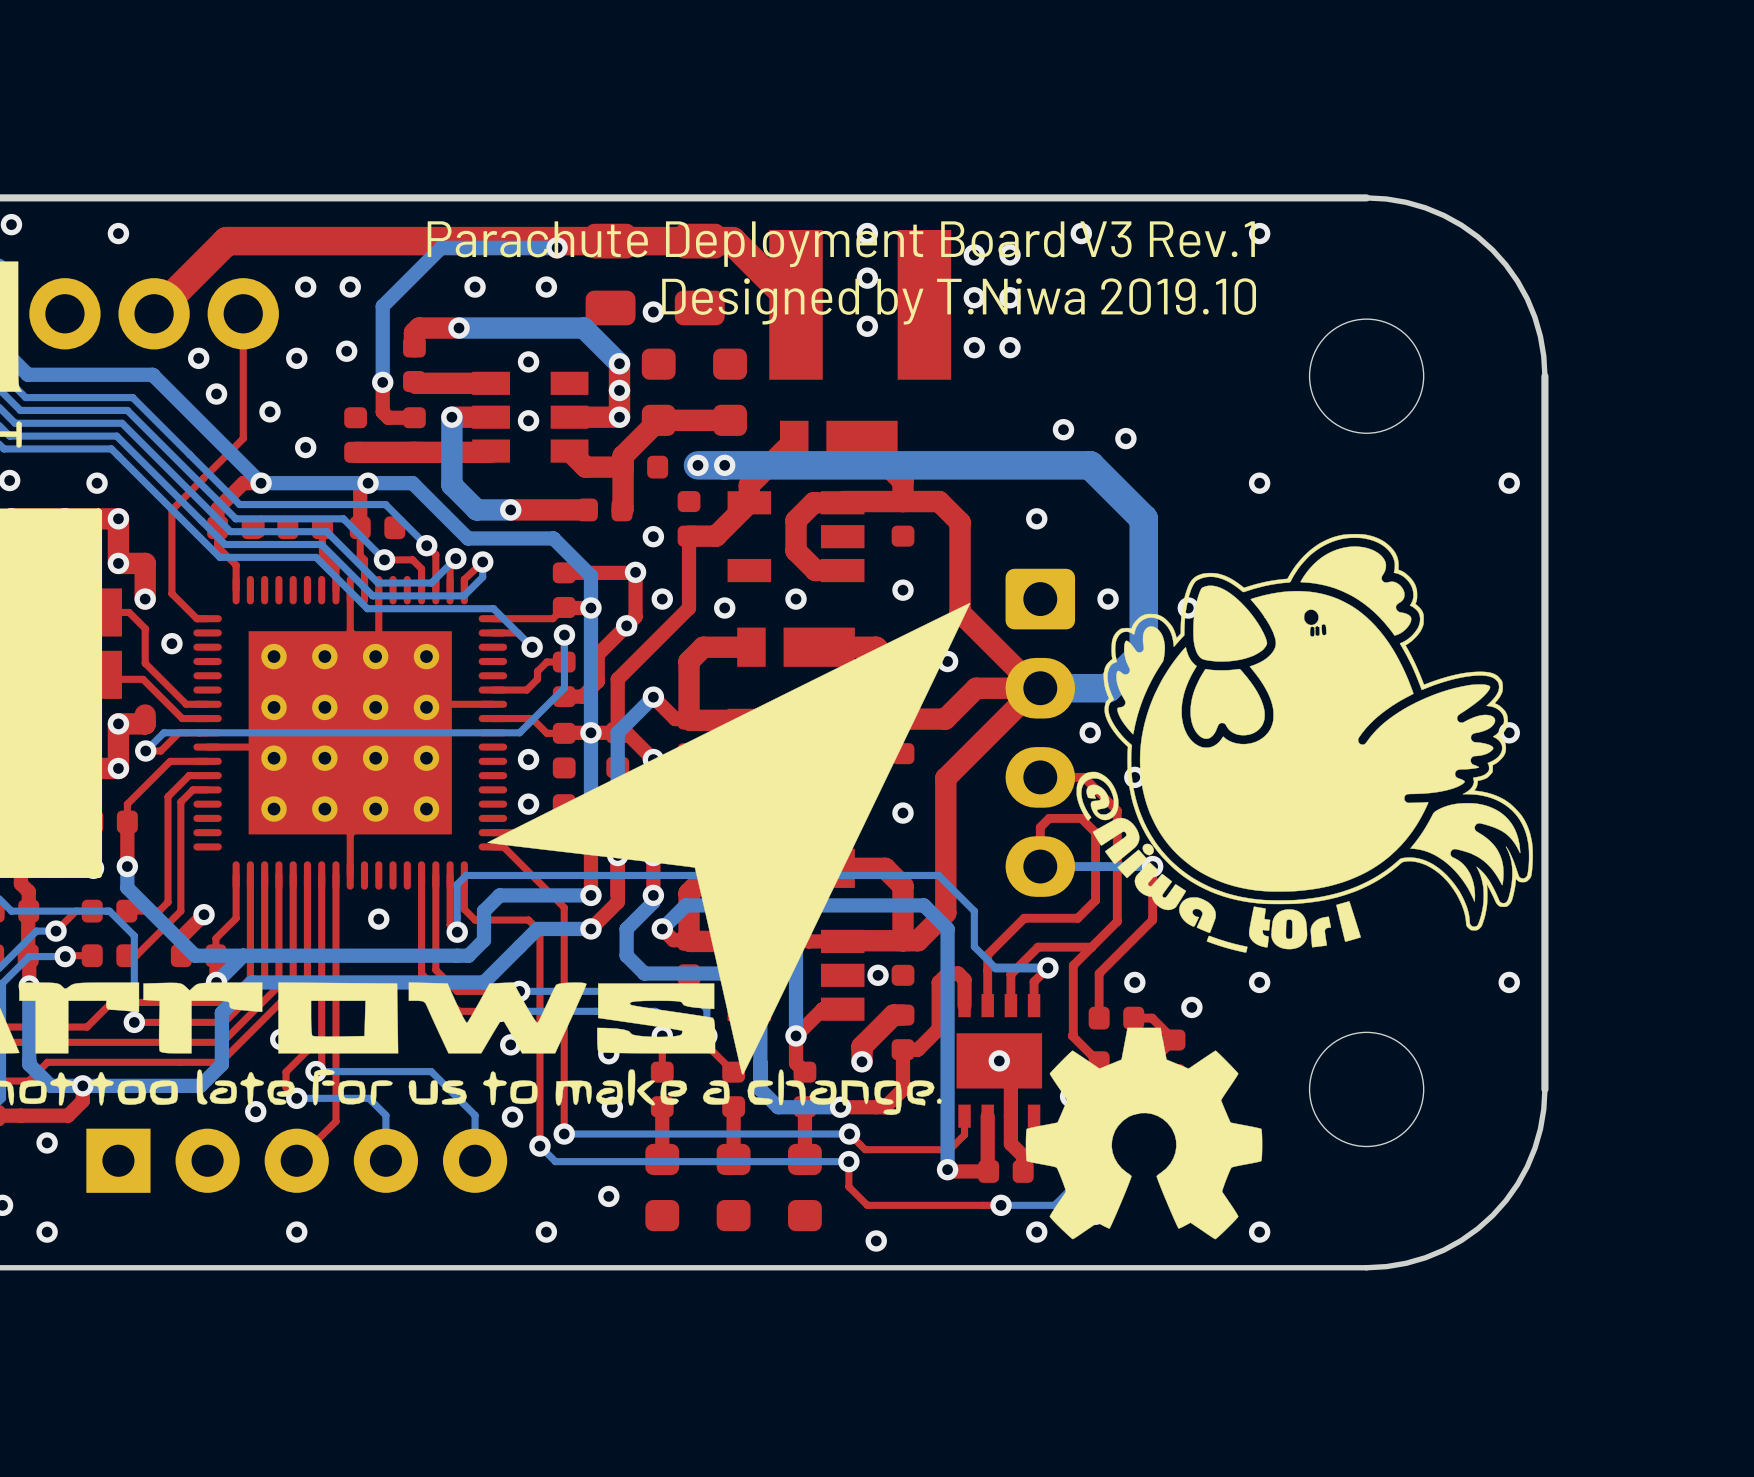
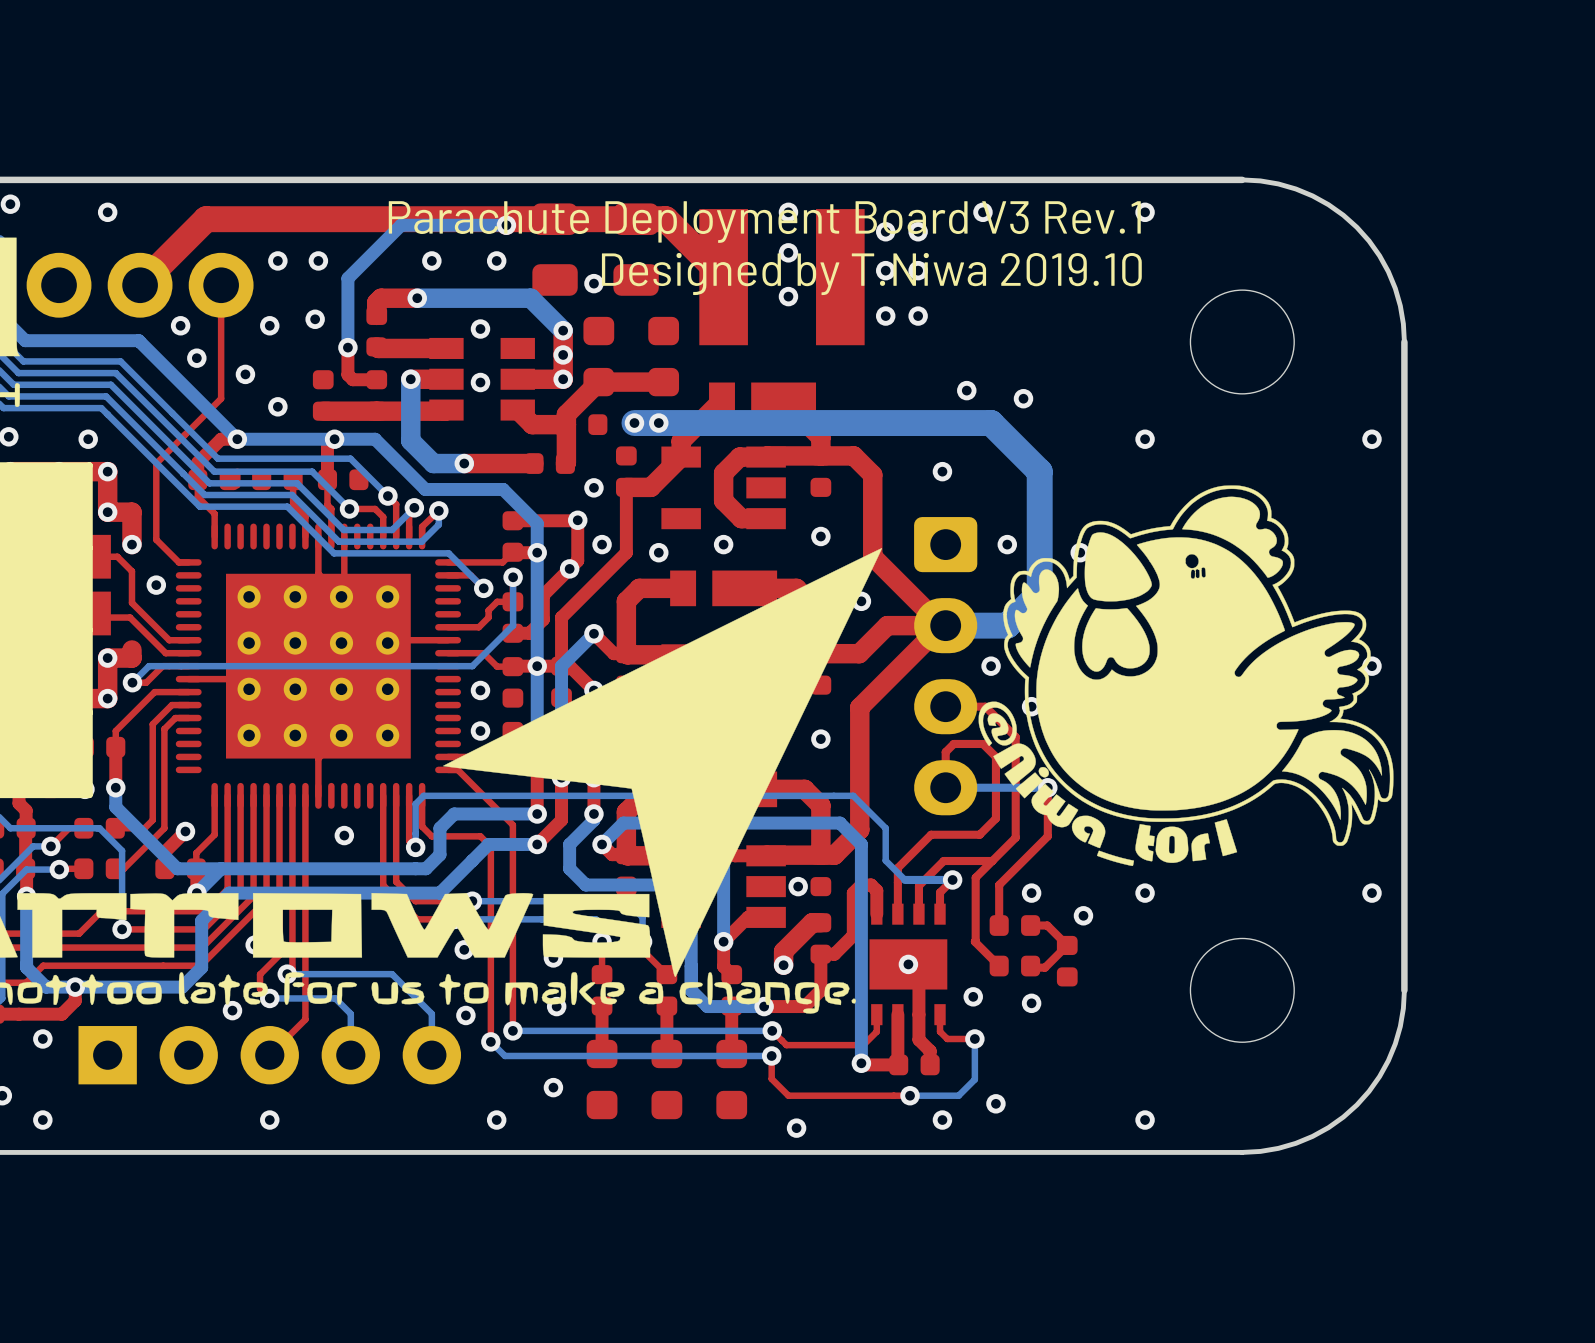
drawing: [1025, 1027, 1263, 1240] -> none

